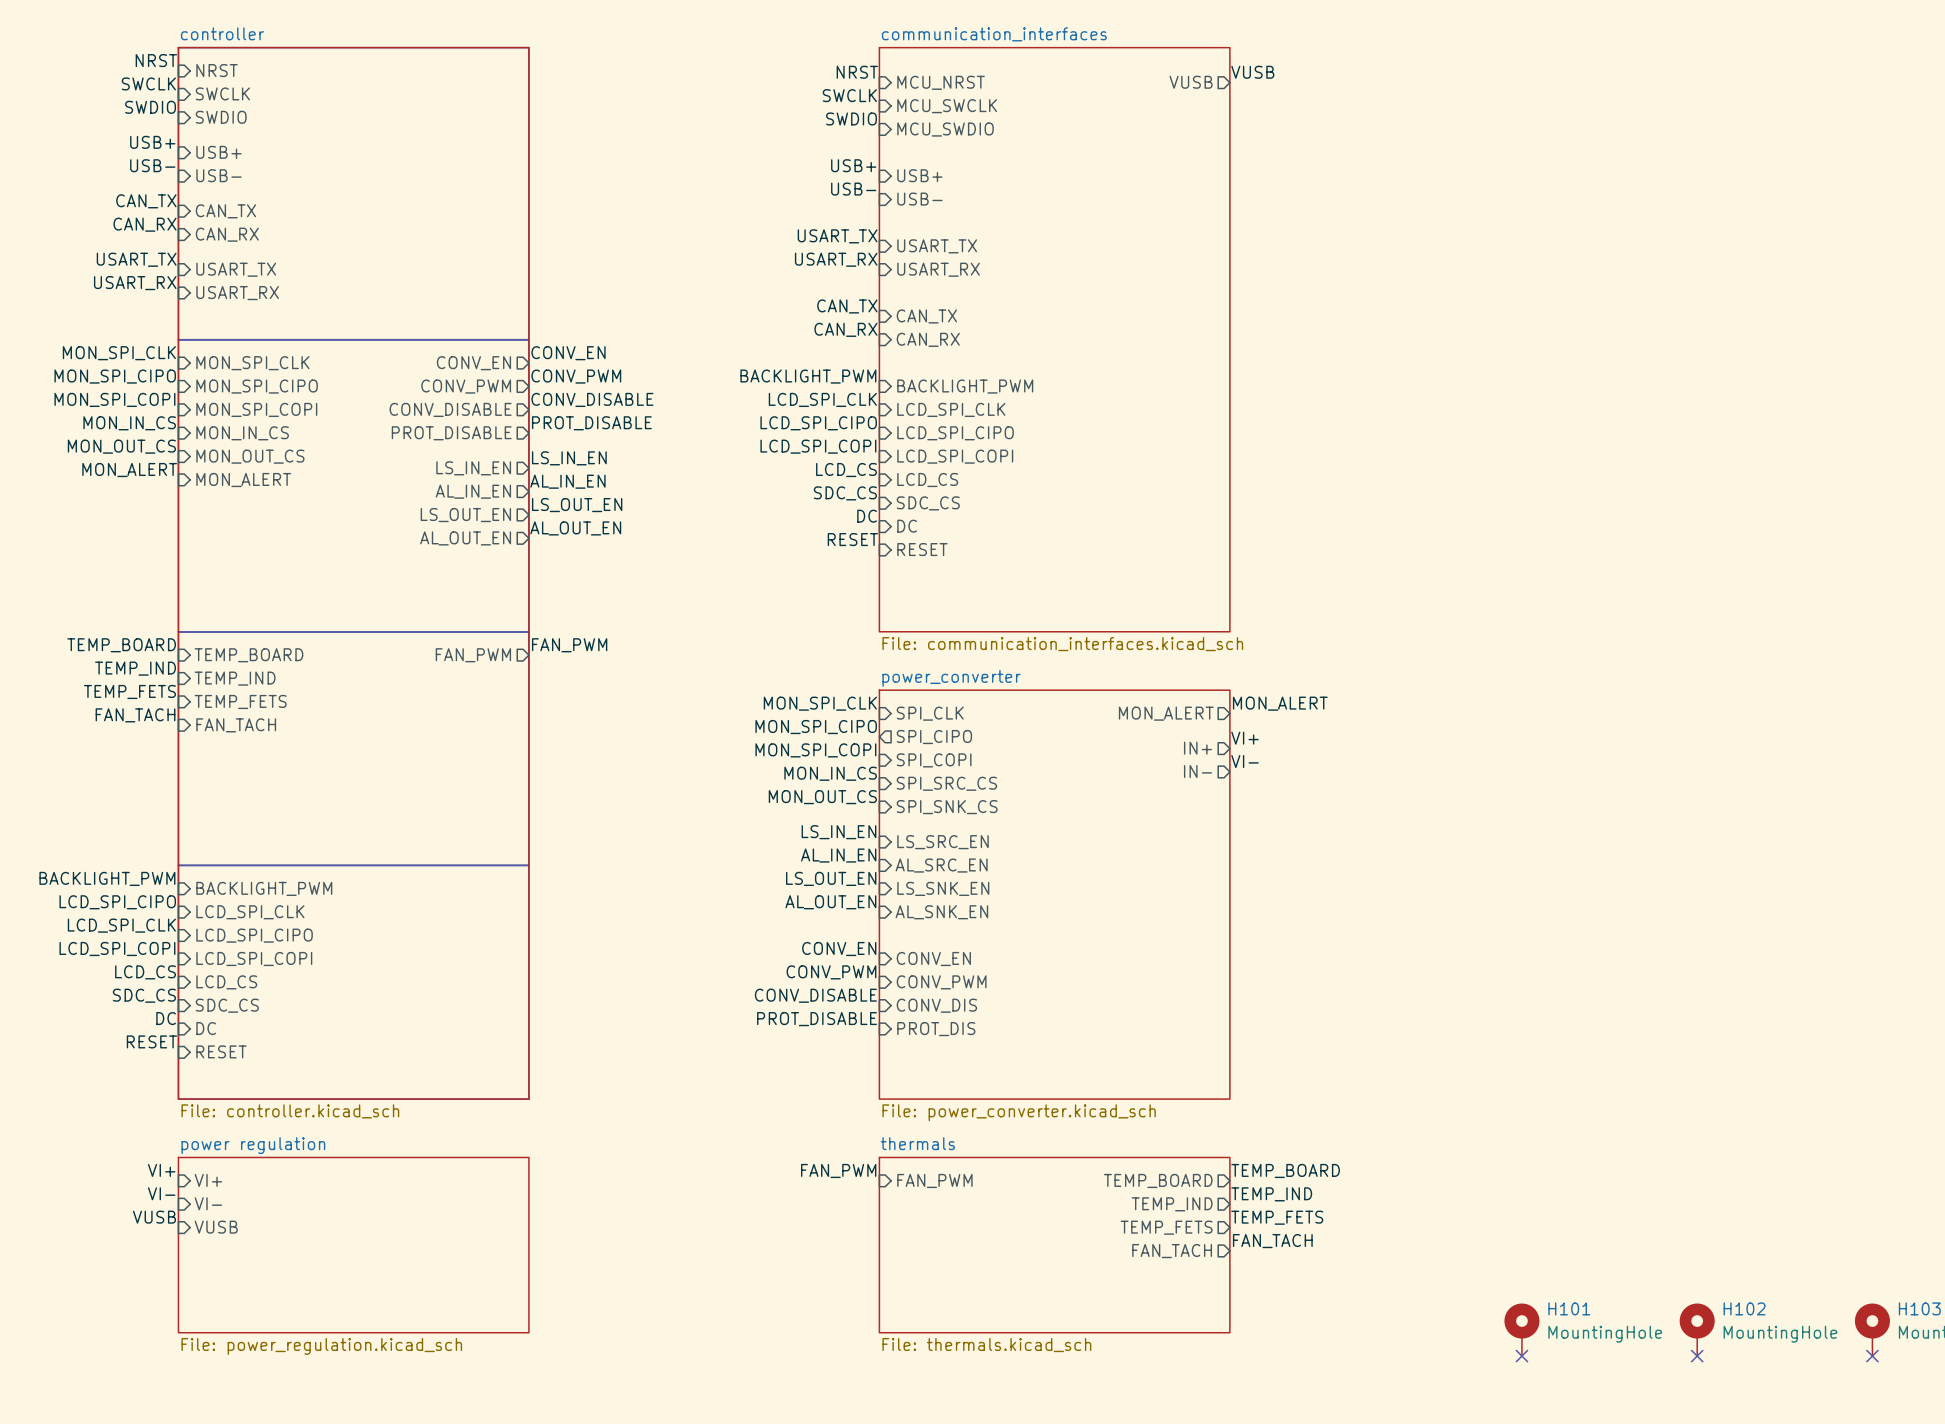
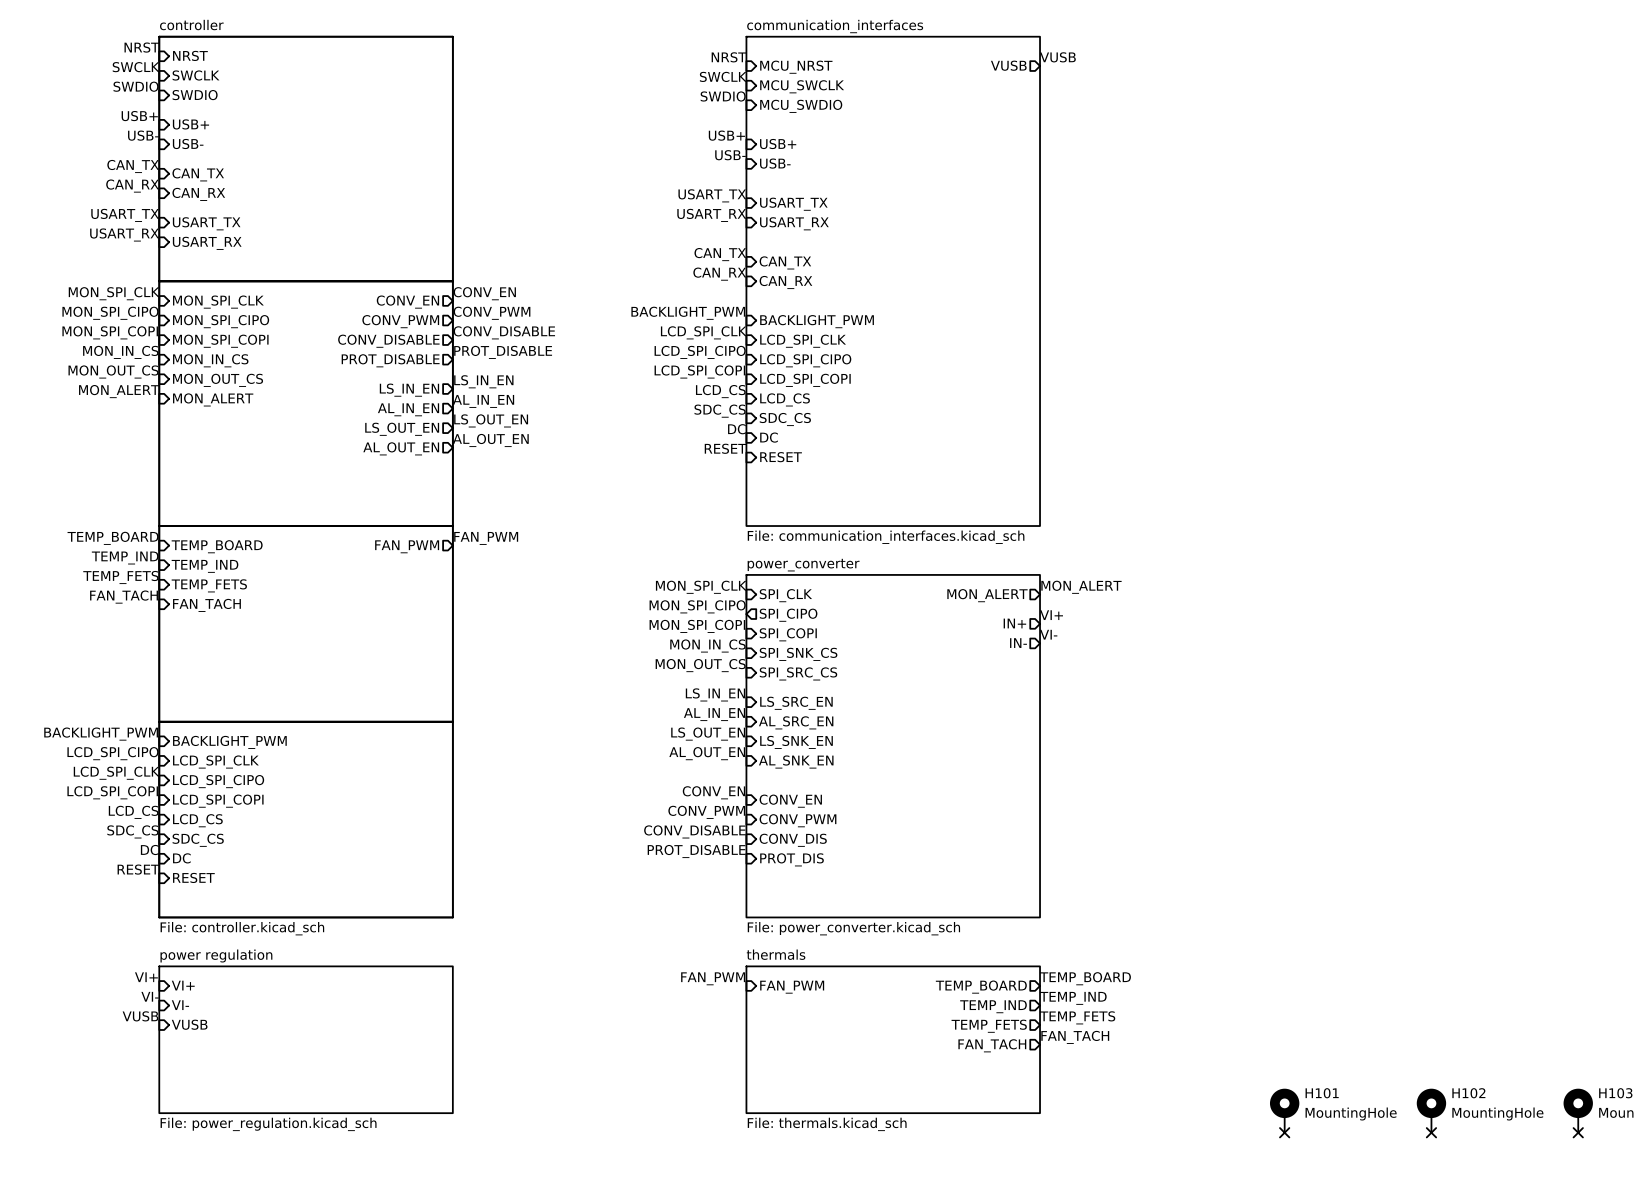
sheet pin: SPI_SRC_CS (946, 783) -> SPI_SNK_CS (798, 654)
sheet pin: SPI_SNK_CS (947, 807) -> SPI_SRC_CS (798, 673)

